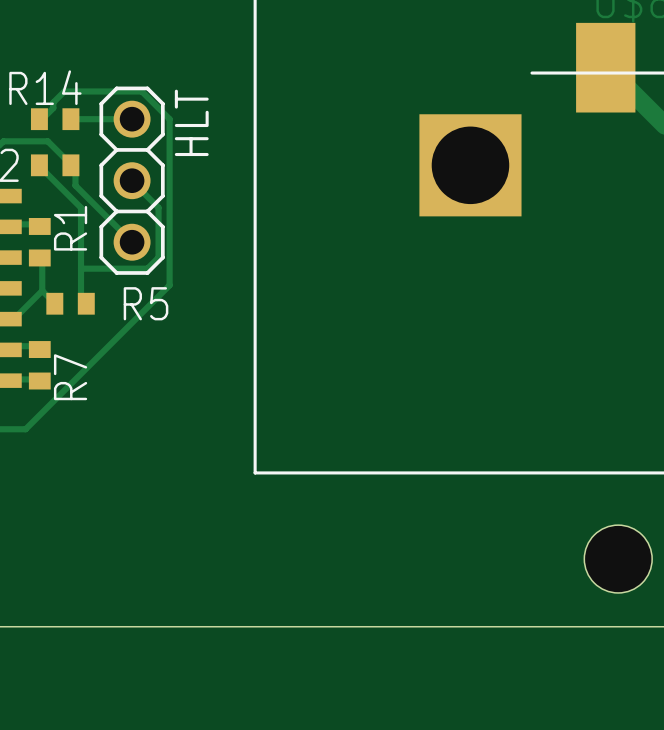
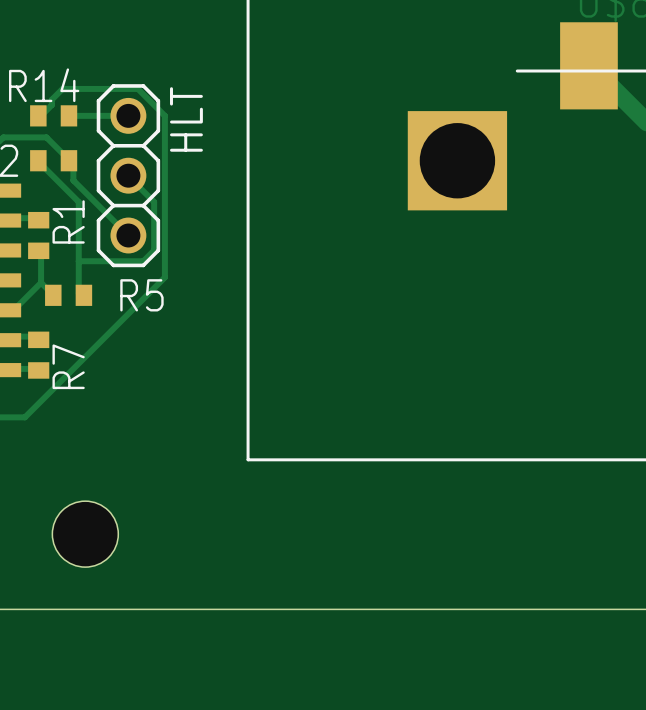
hole position: (618, 559) -> (85, 534)

